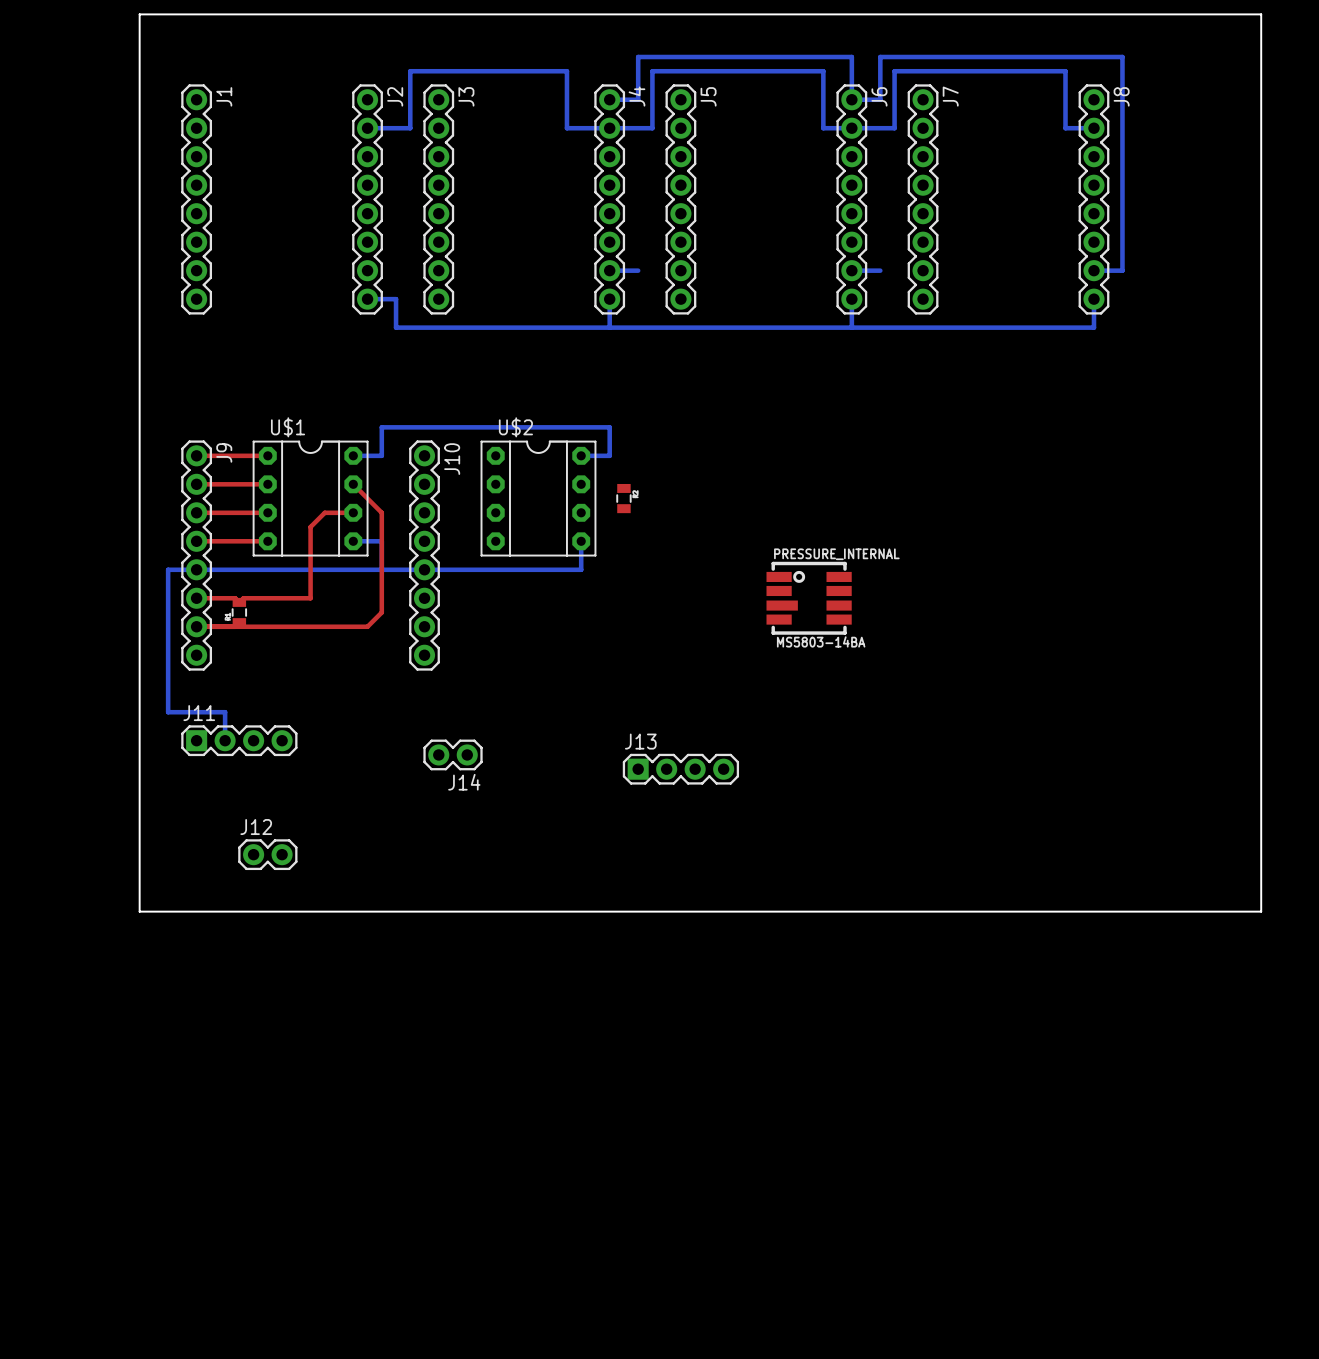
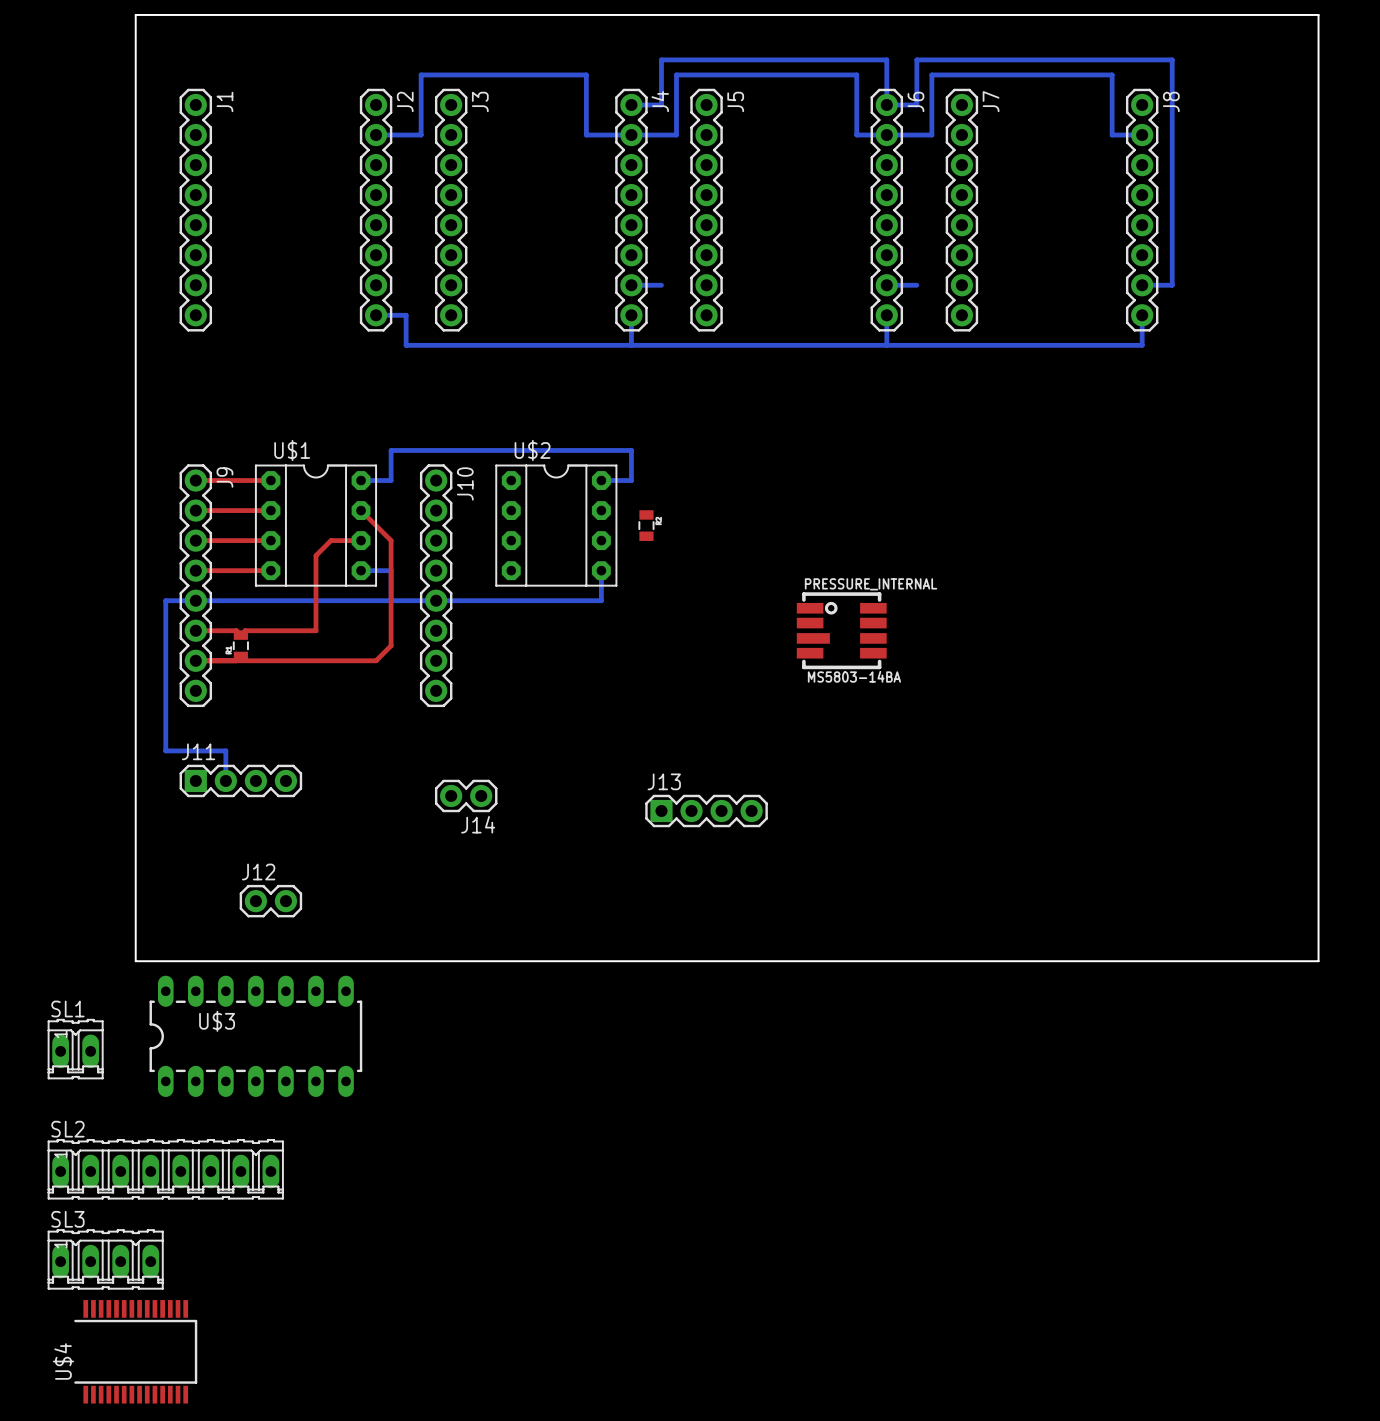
U$3: none -> (255, 1036)
SL1: none -> (75, 1049)
SL2: none -> (165, 1169)
SL3: none -> (105, 1259)
U$4: none -> (135, 1351)

